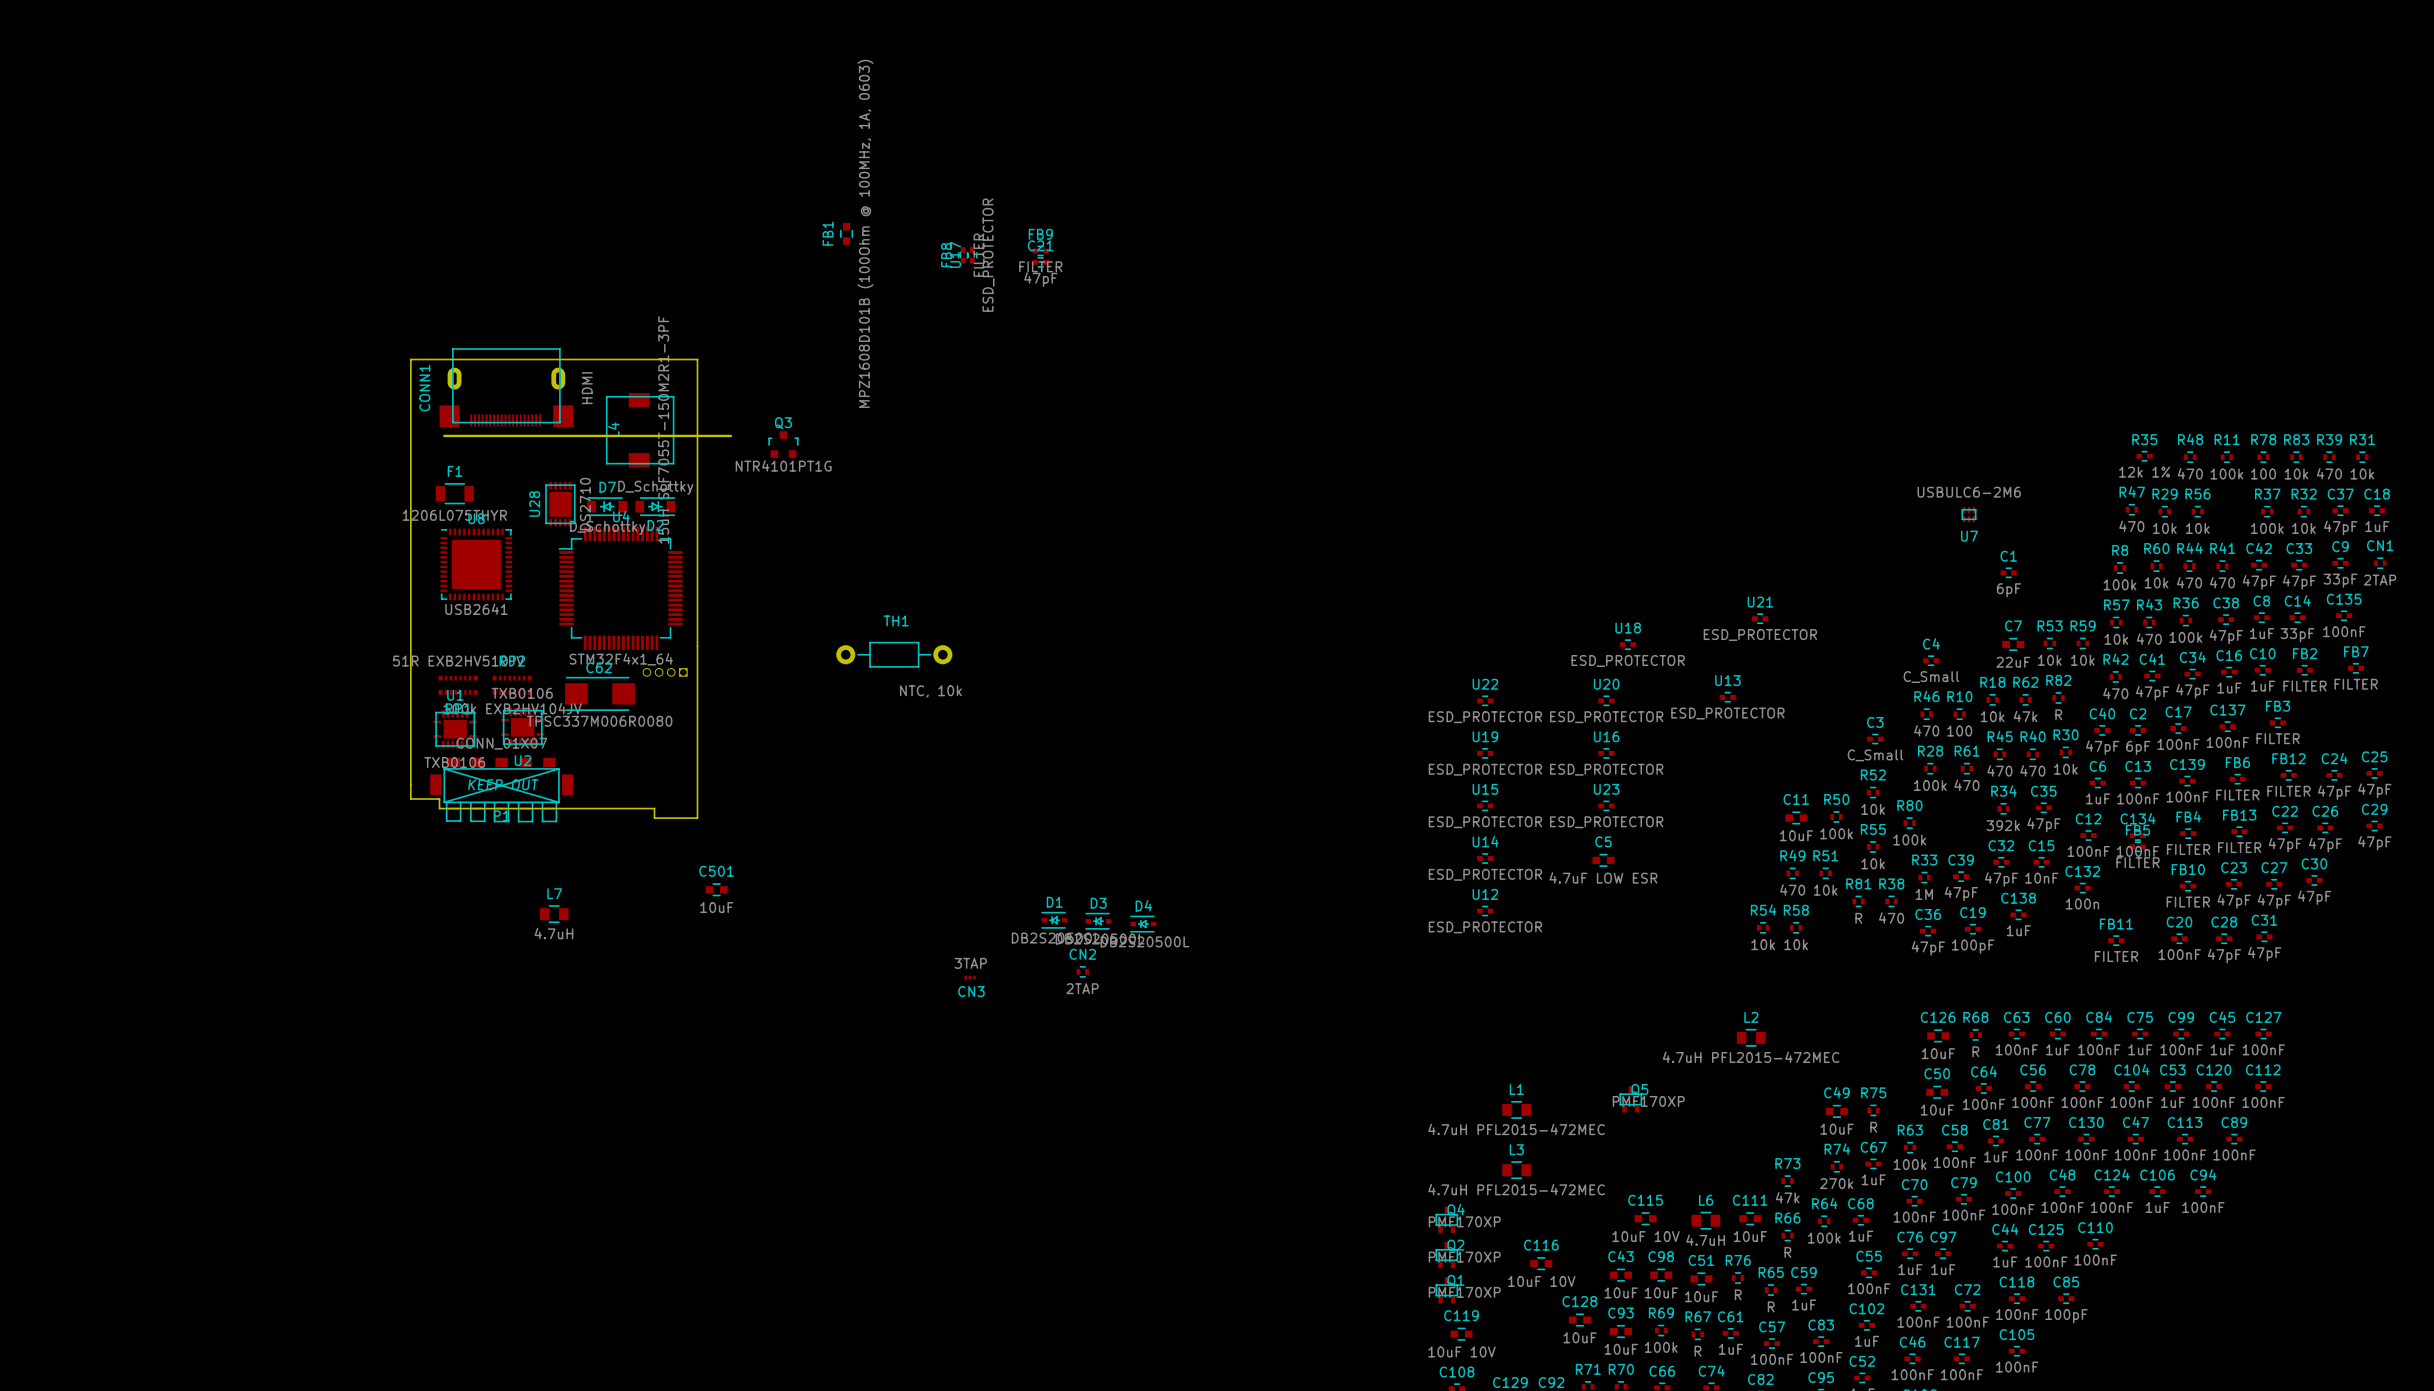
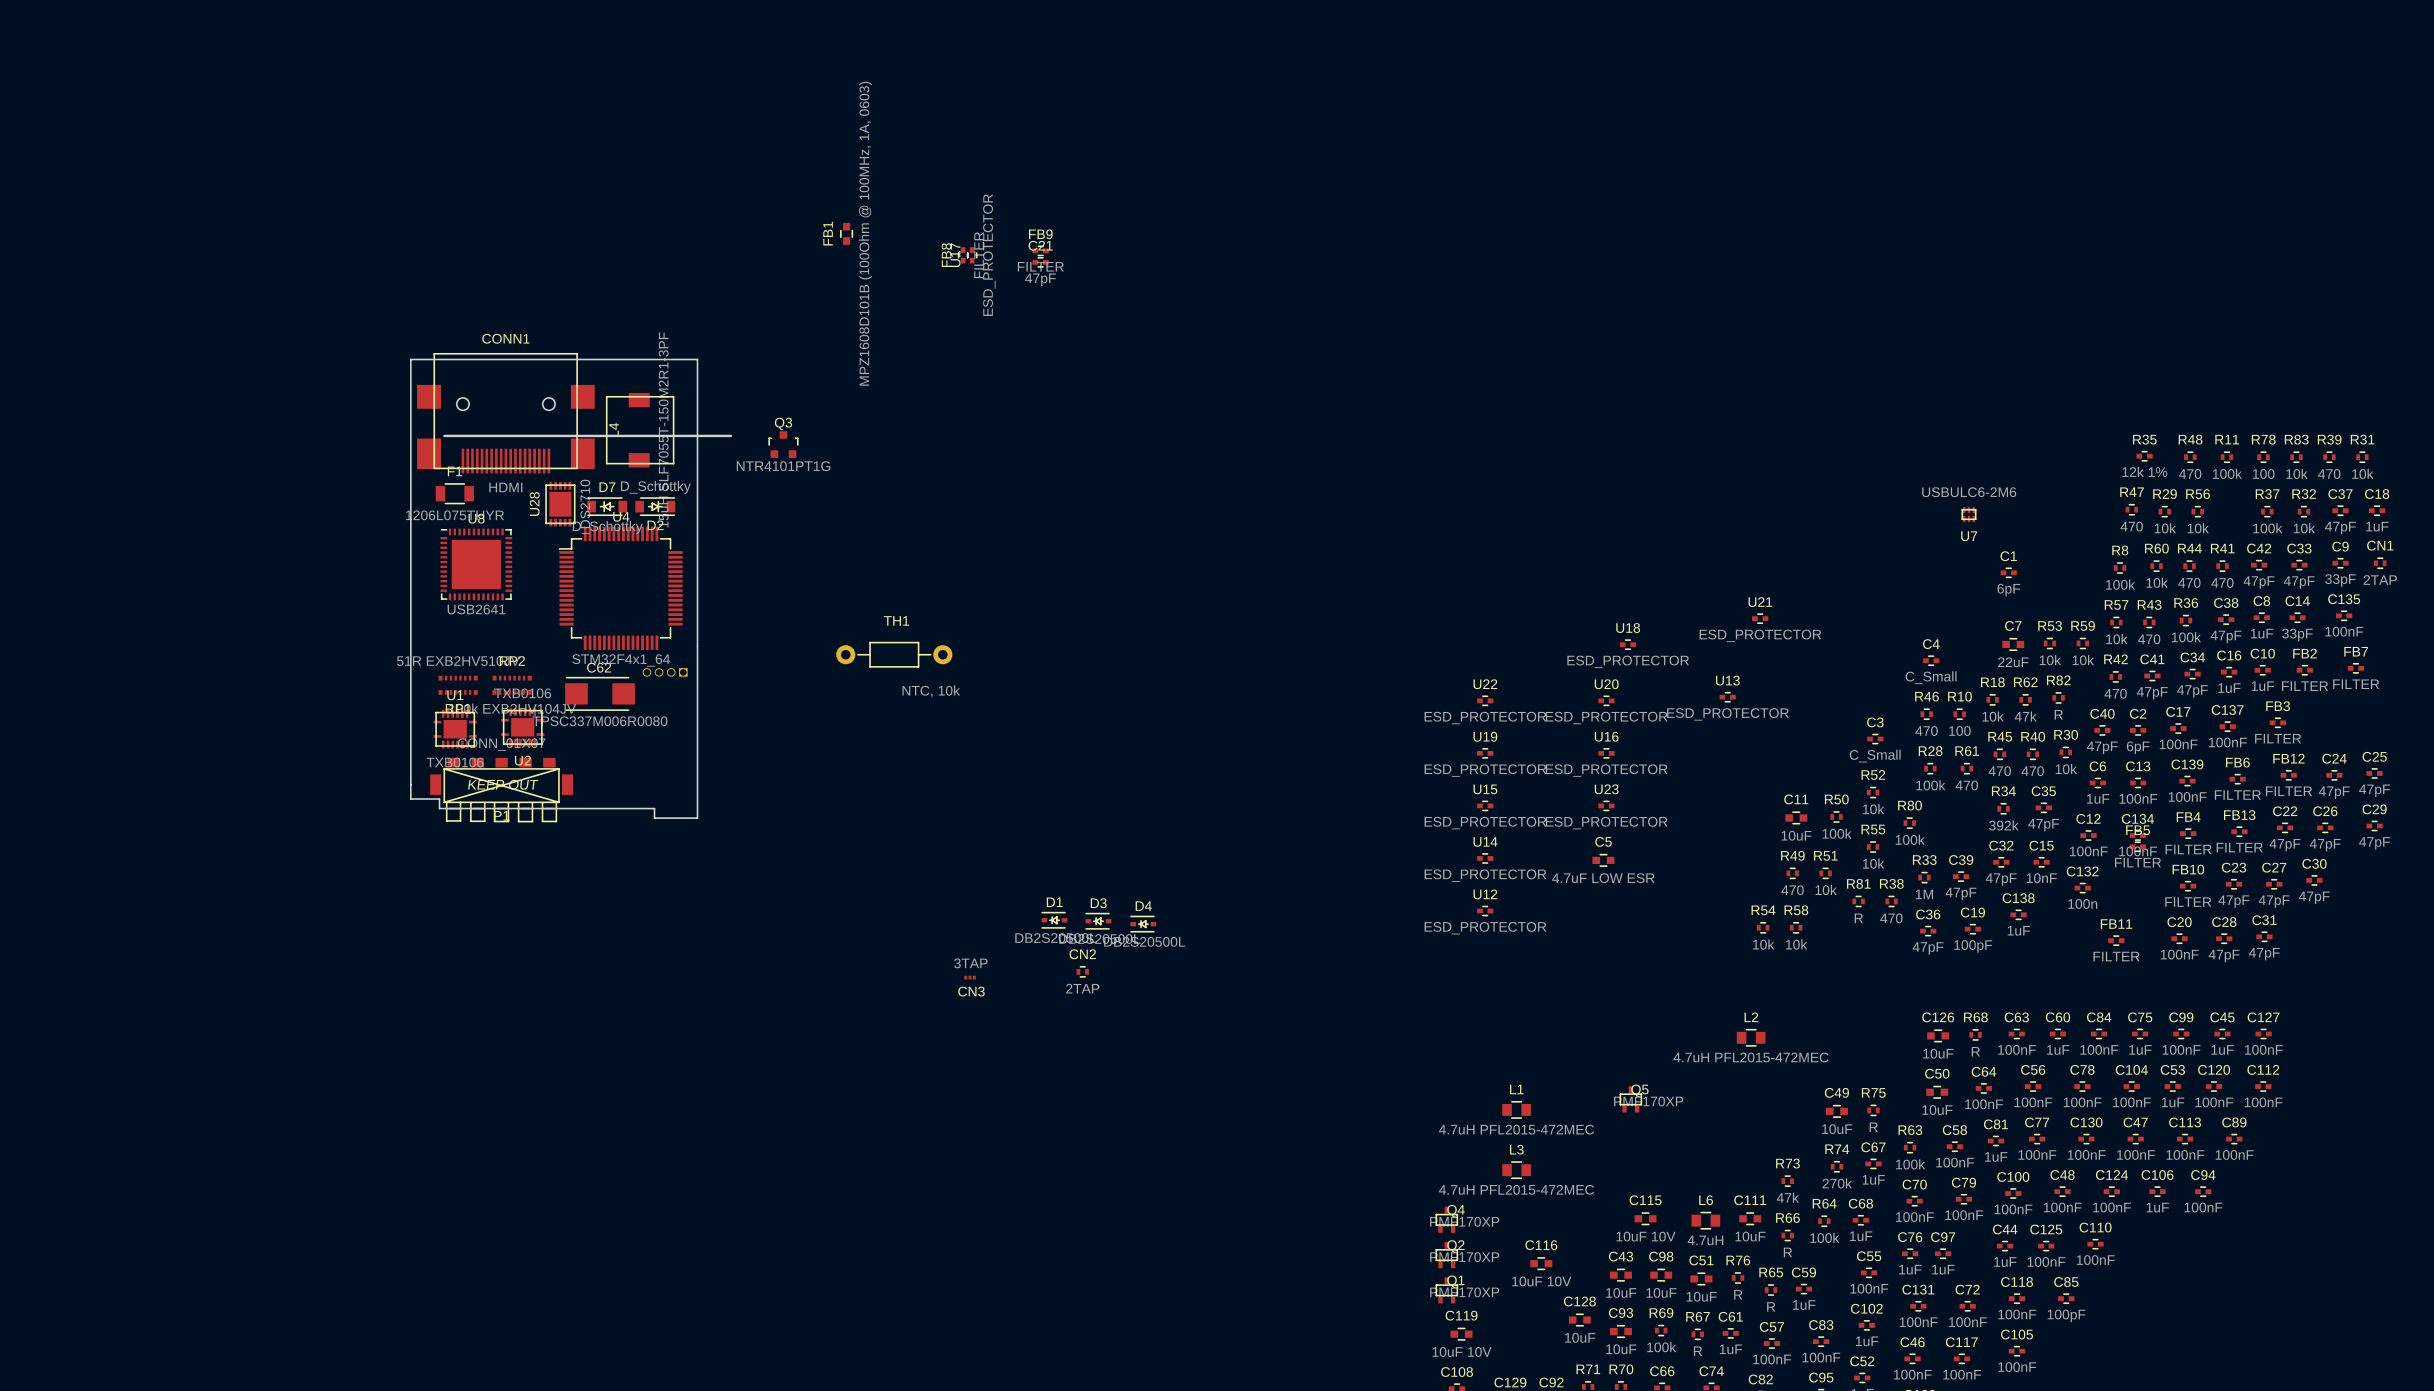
CONN1 footprint: [439, 348, 574, 428] -> [417, 353, 595, 474]
CONN1 name position: CONN1 (424, 388) -> CONN1 (505, 338)
CONN1 value position: HDMI (587, 388) -> HDMI (505, 487)
C501: 10uF (716, 889) -> none
L7: 4.7uH (554, 914) -> none

